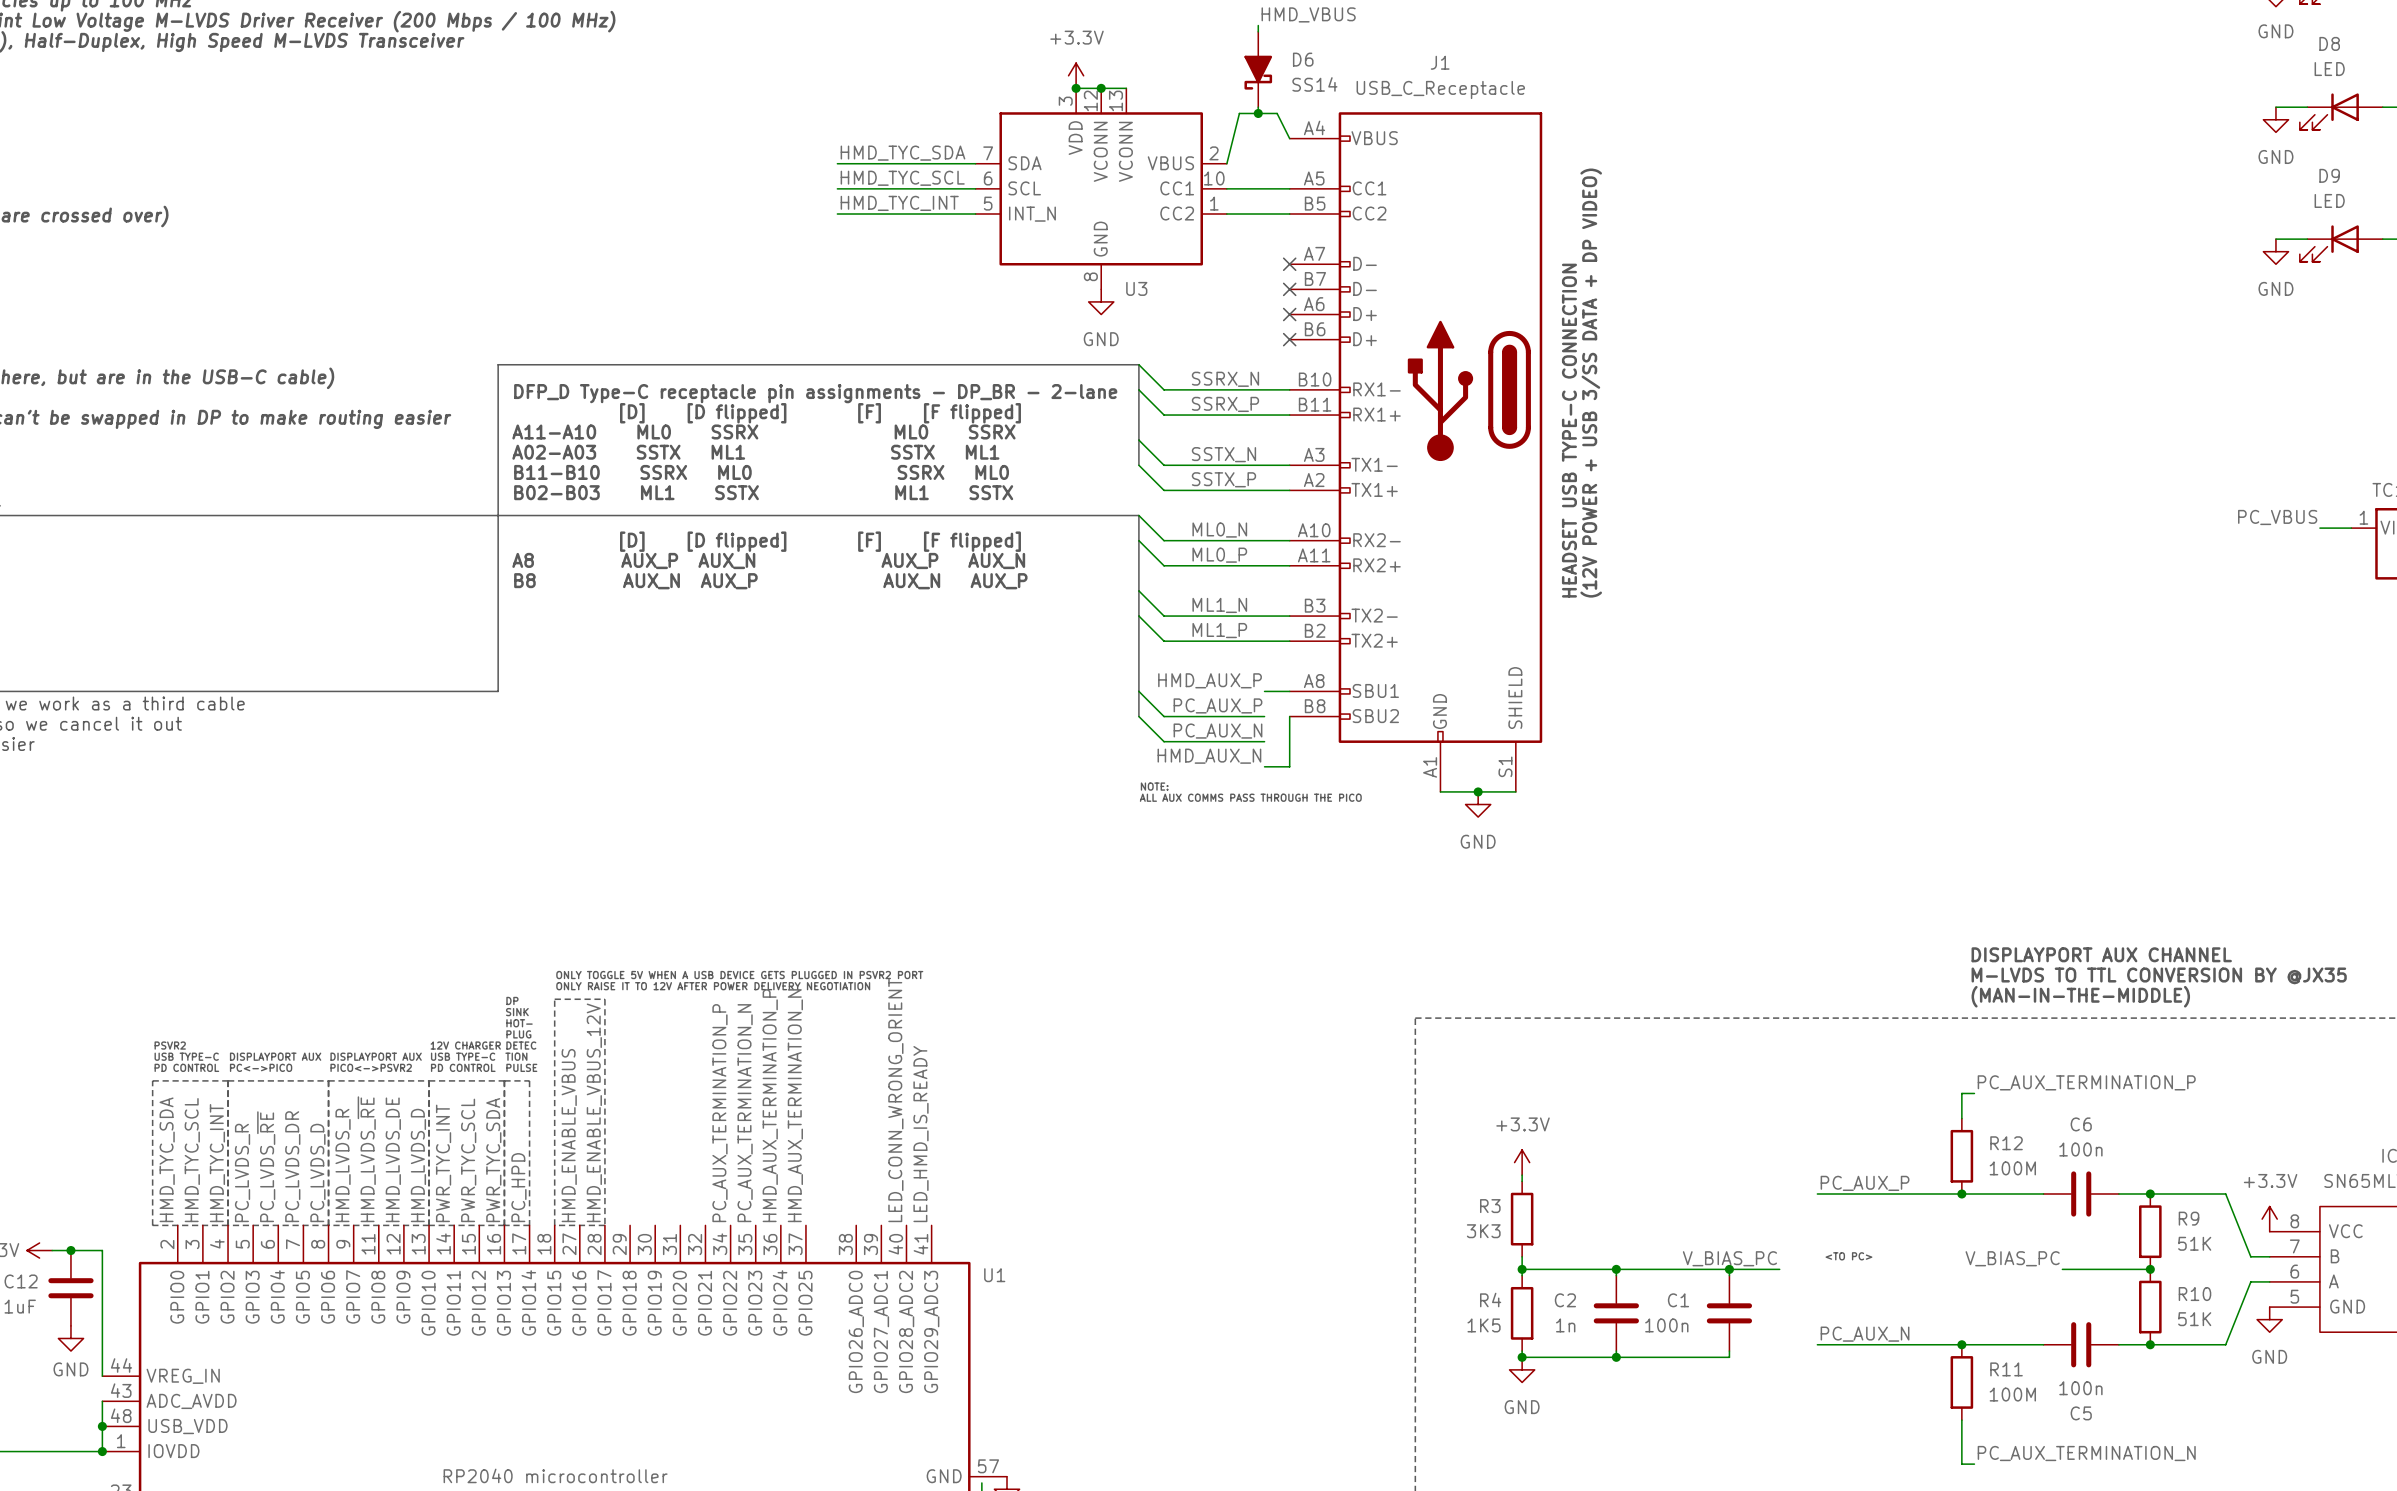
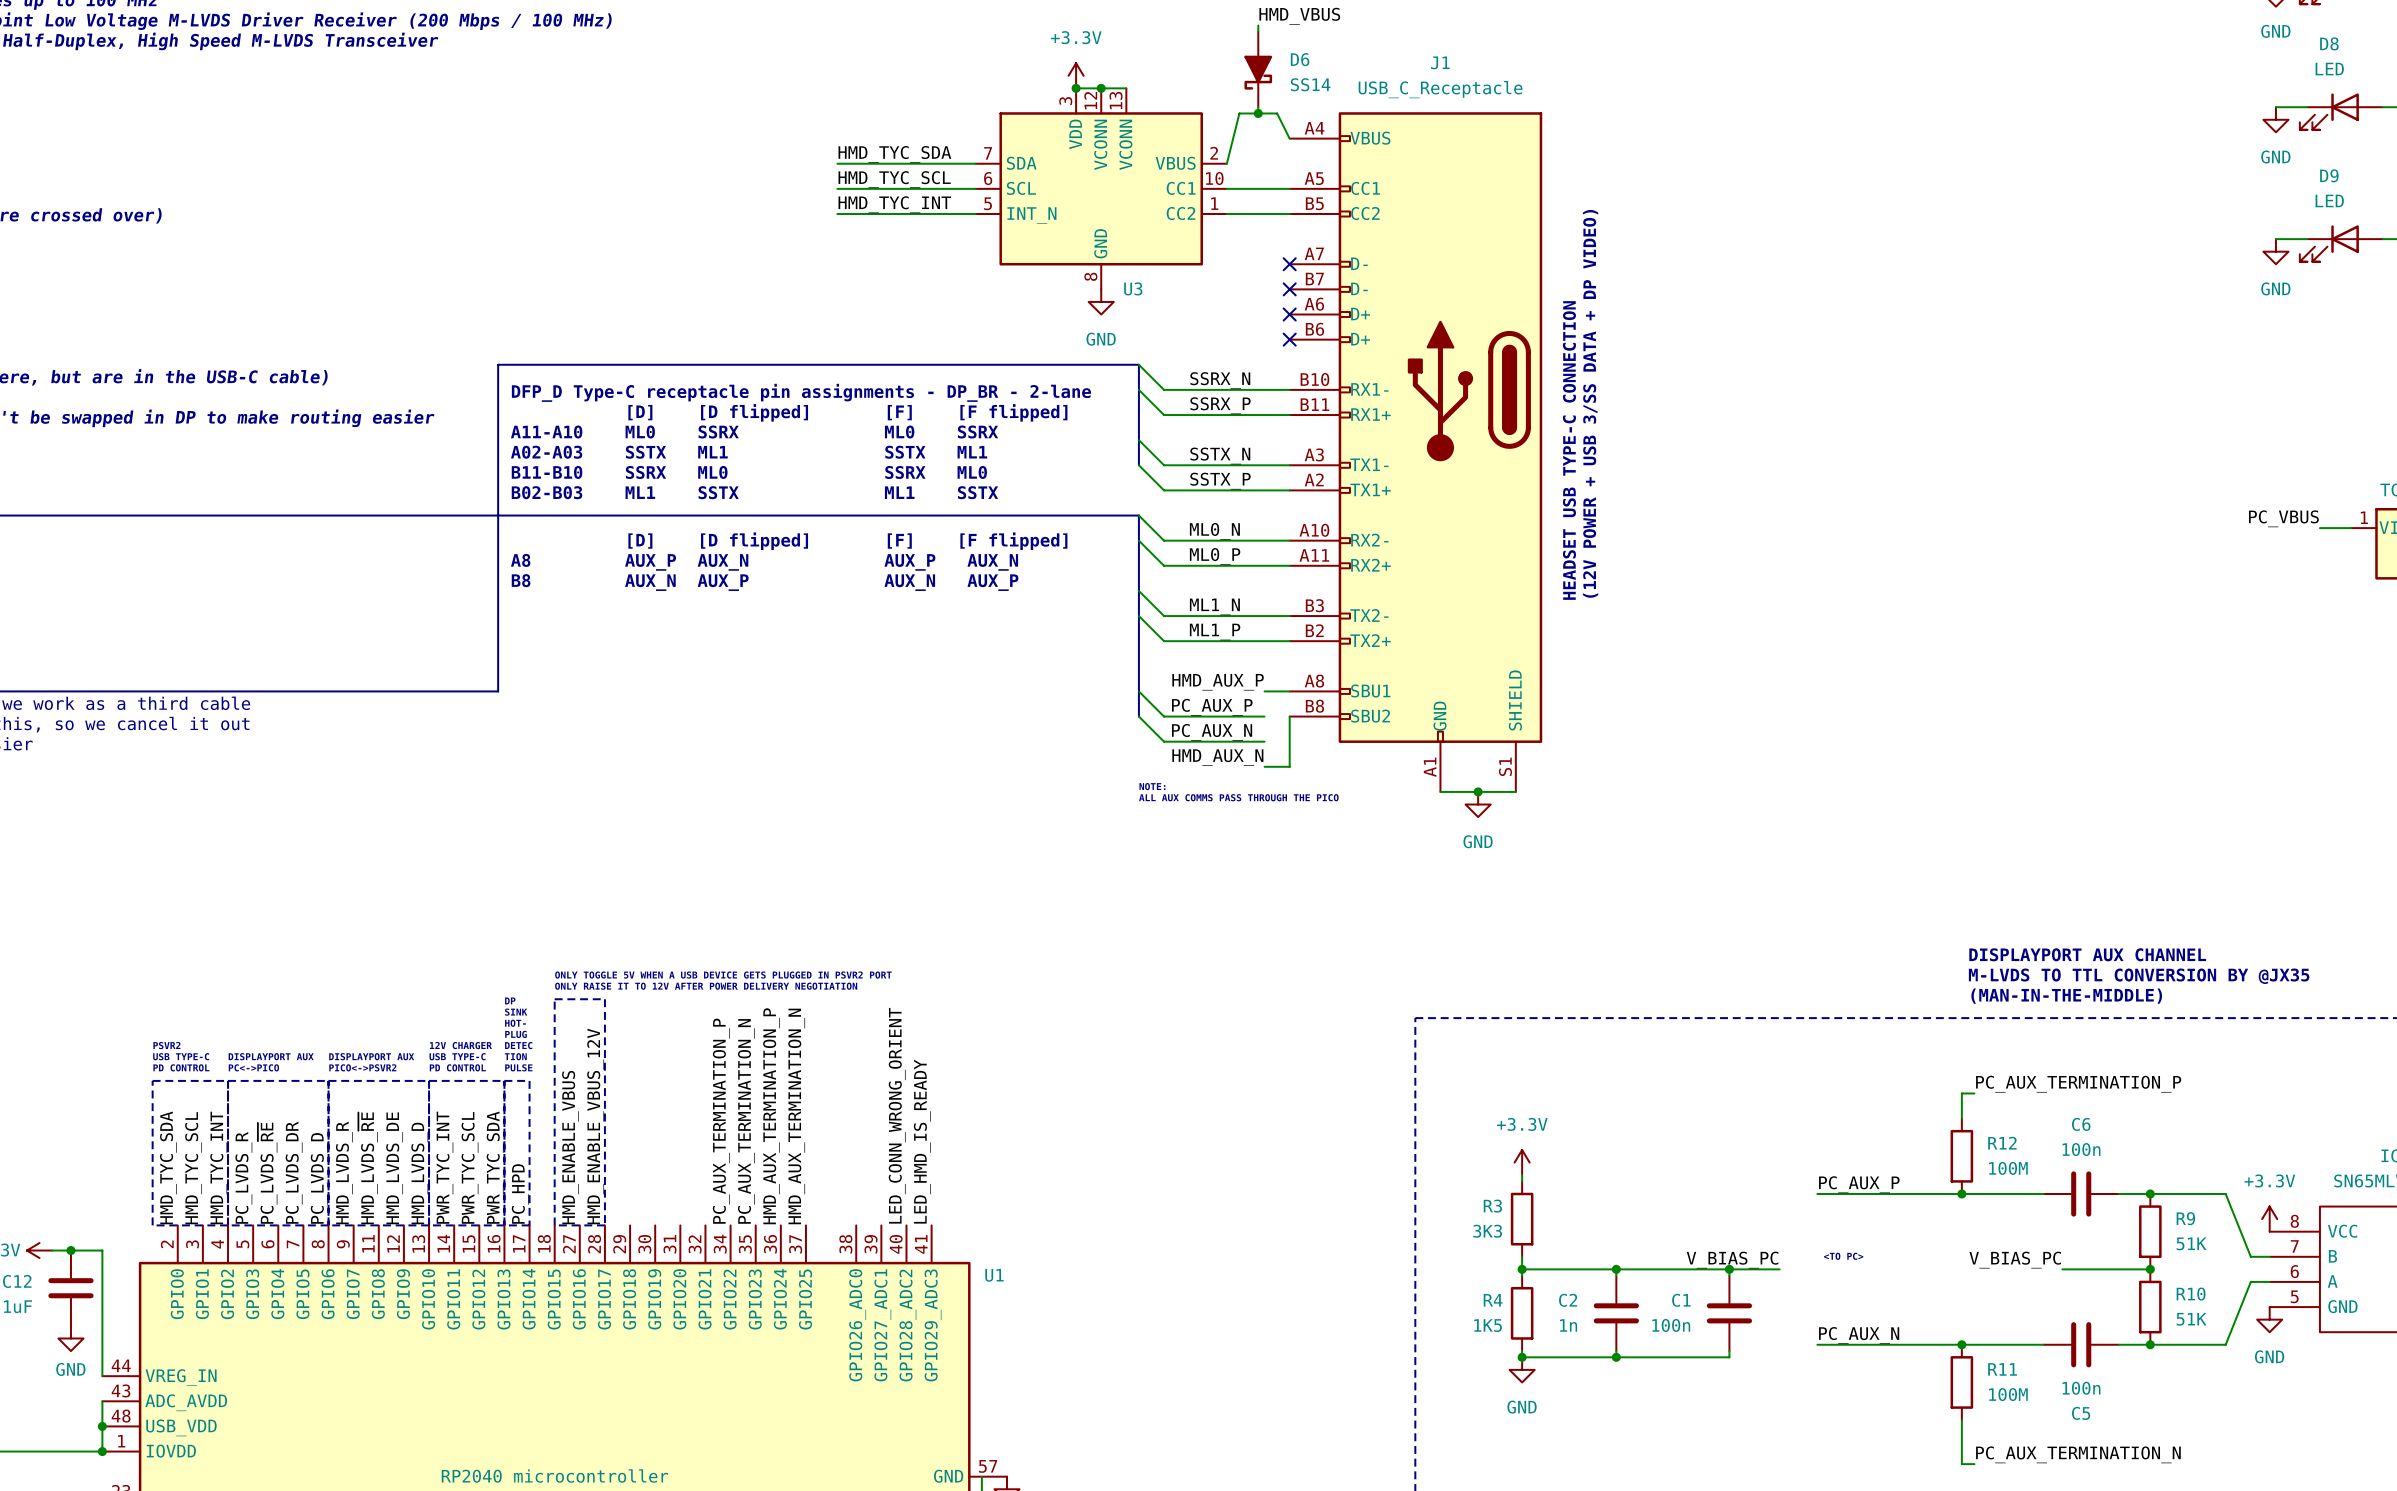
wire: none -> (981, 1476) (981, 1482)

